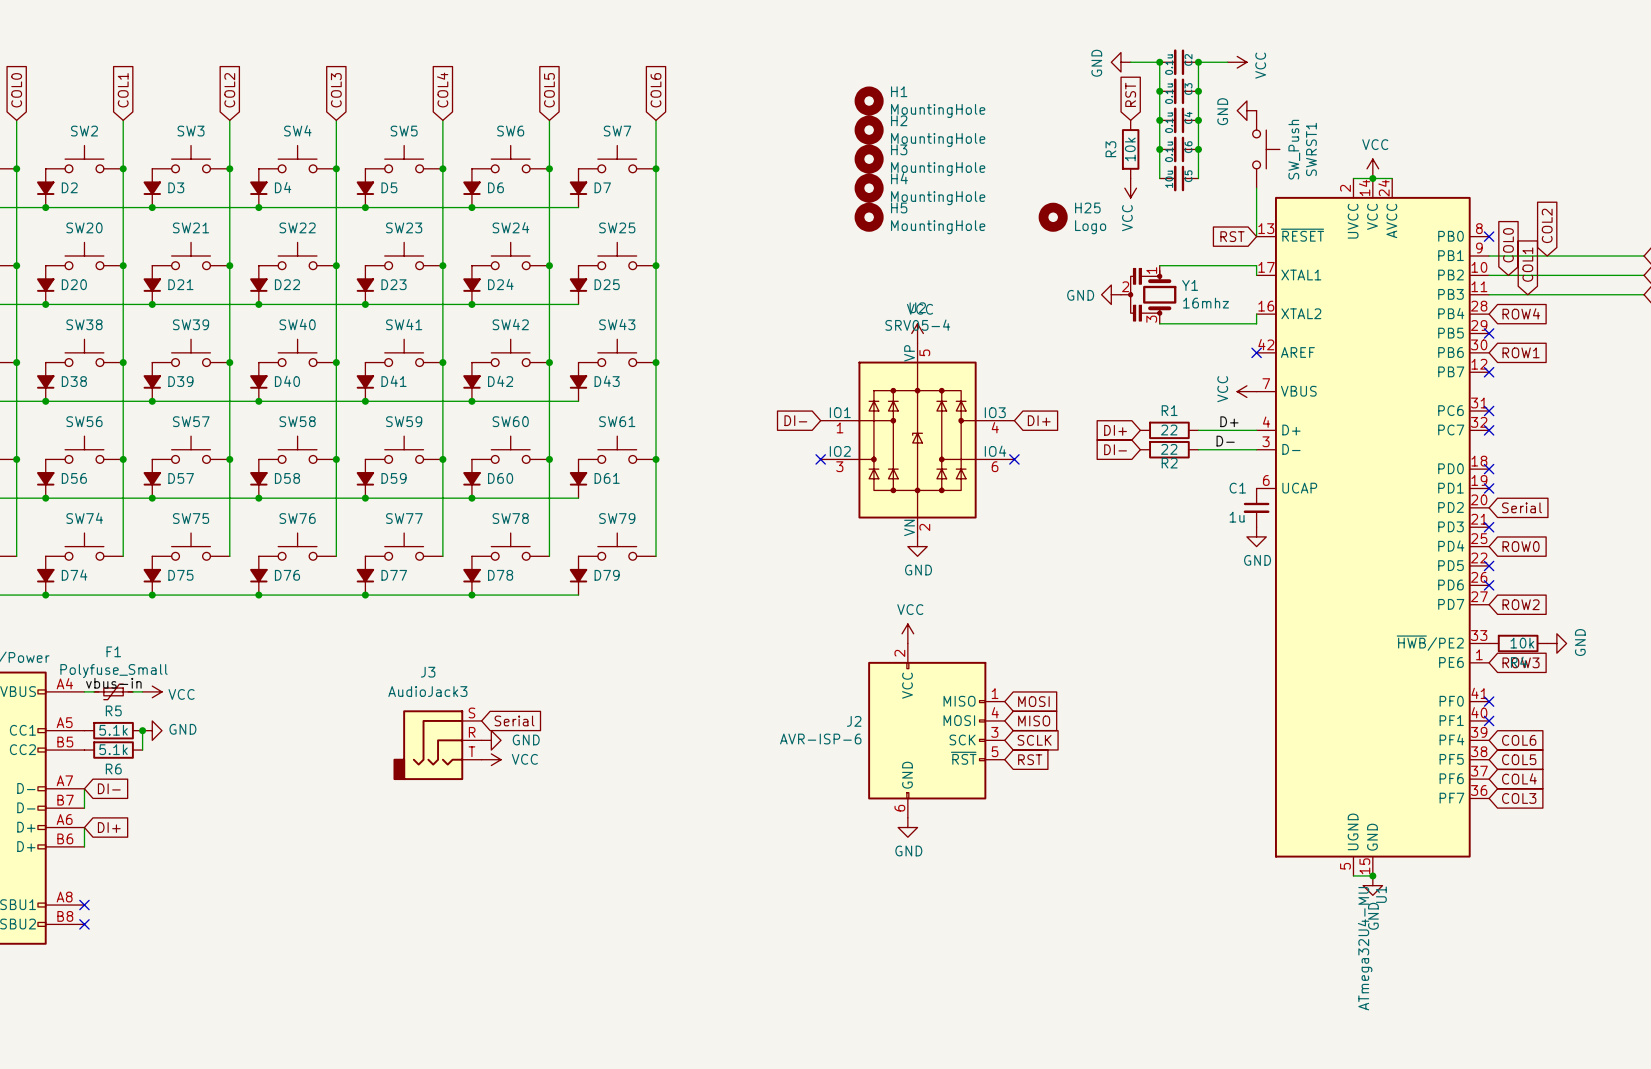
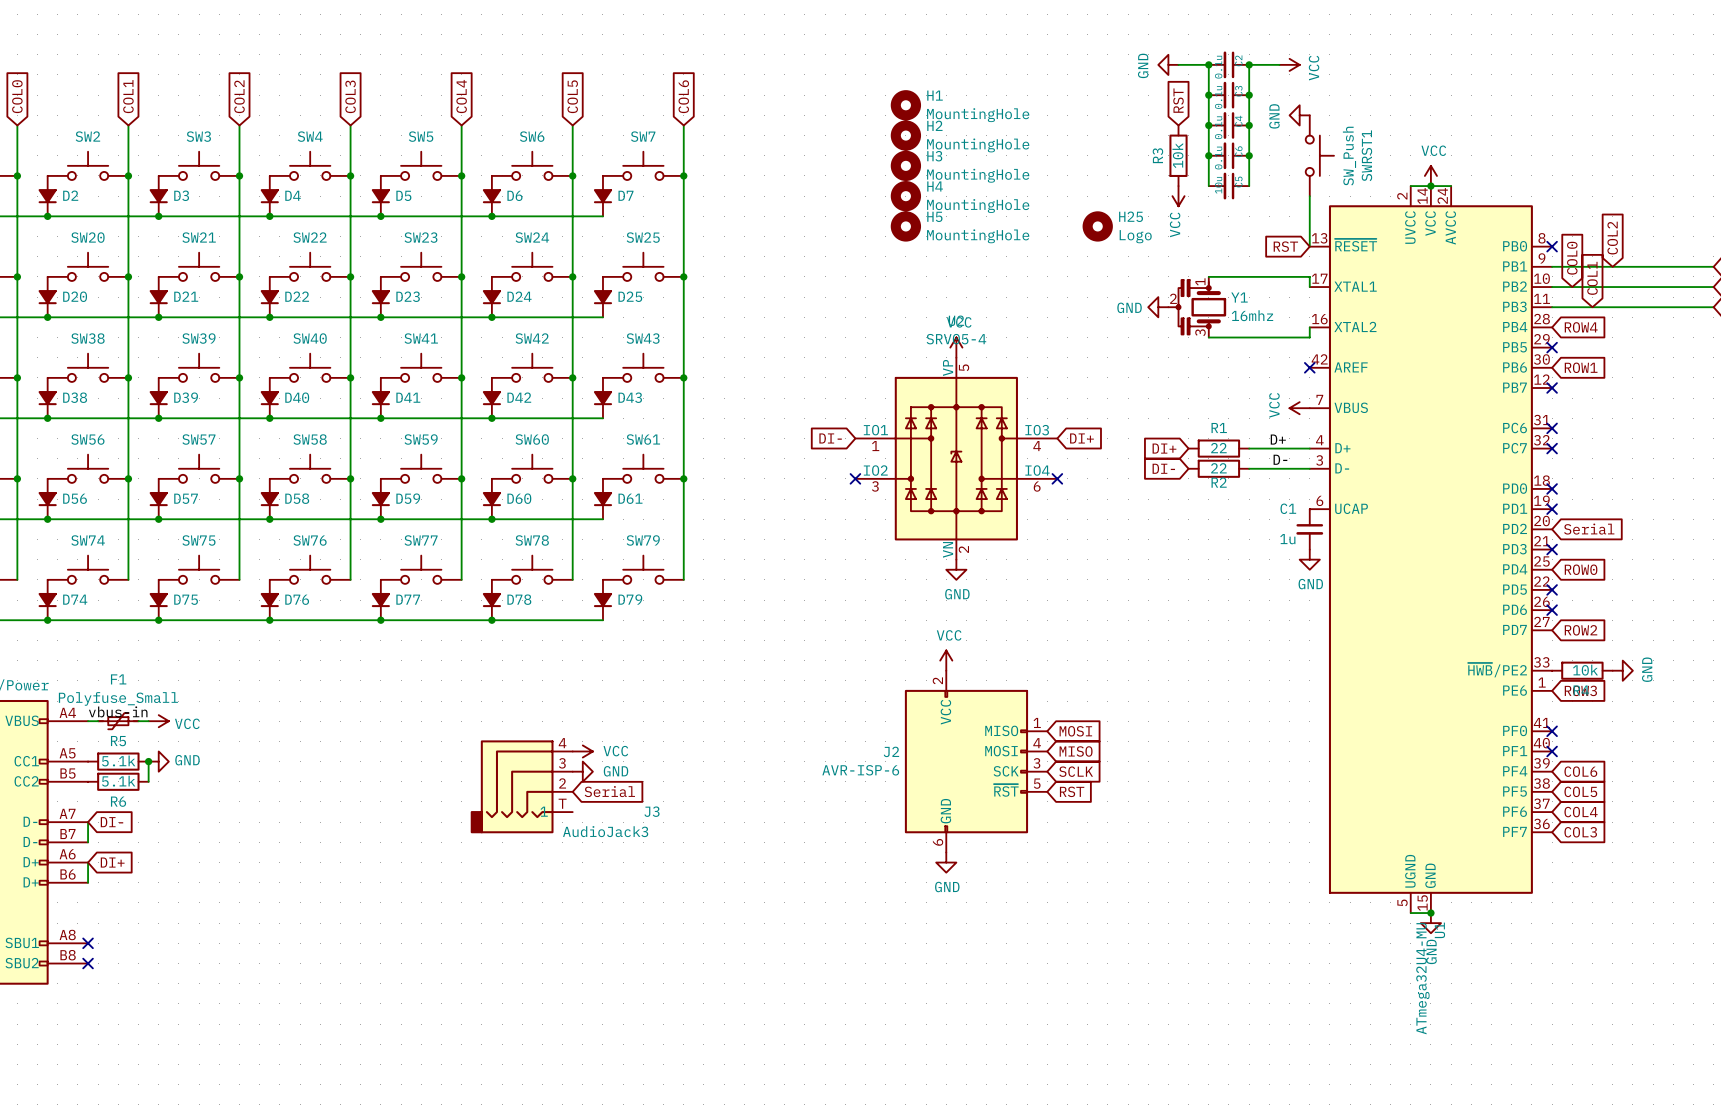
J3 name position: J3 (428, 672) -> J3 (652, 811)
J3 value position: AudioJack3 (427, 691) -> AudioJack3 (605, 831)
J3 symbol: [393, 710, 482, 781] -> [470, 740, 573, 834]
global label position: Serial (514, 720) -> Serial (609, 791)
power symbol position: GND (491, 740) -> GND (582, 771)
power symbol position: VCC (491, 759) -> VCC (582, 751)

